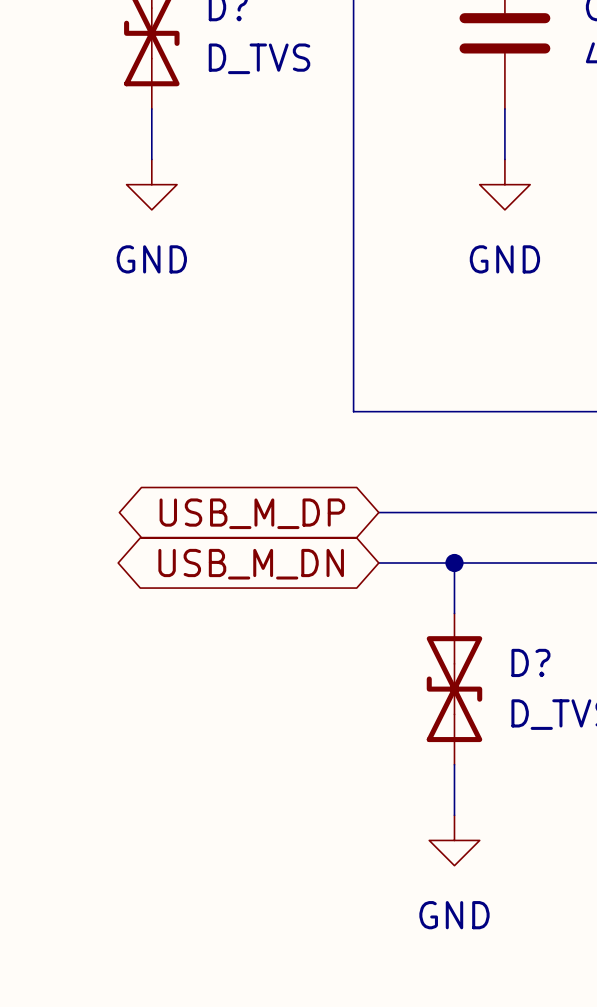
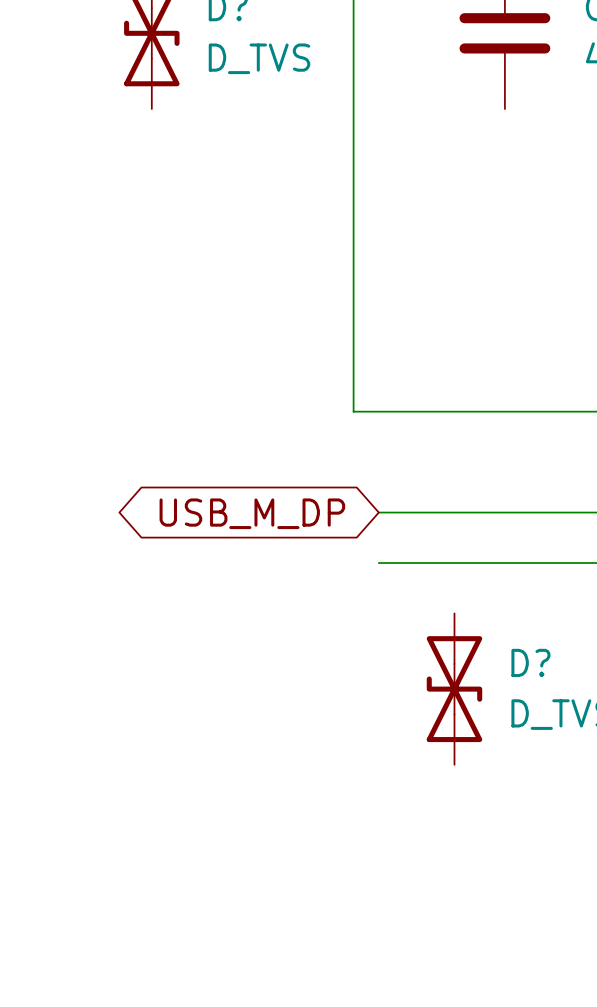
wire: (151, 108) (151, 159) -> none
wire: (504, 108) (504, 159) -> none
power symbol: GND (151, 184) -> none
power symbol: GND (504, 184) -> none
wire: (454, 563) (454, 613) -> none
junction: (454, 563) -> none
global label: USB_M_DN (251, 564) -> none
wire: (454, 764) (454, 815) -> none
power symbol: GND (454, 840) -> none

